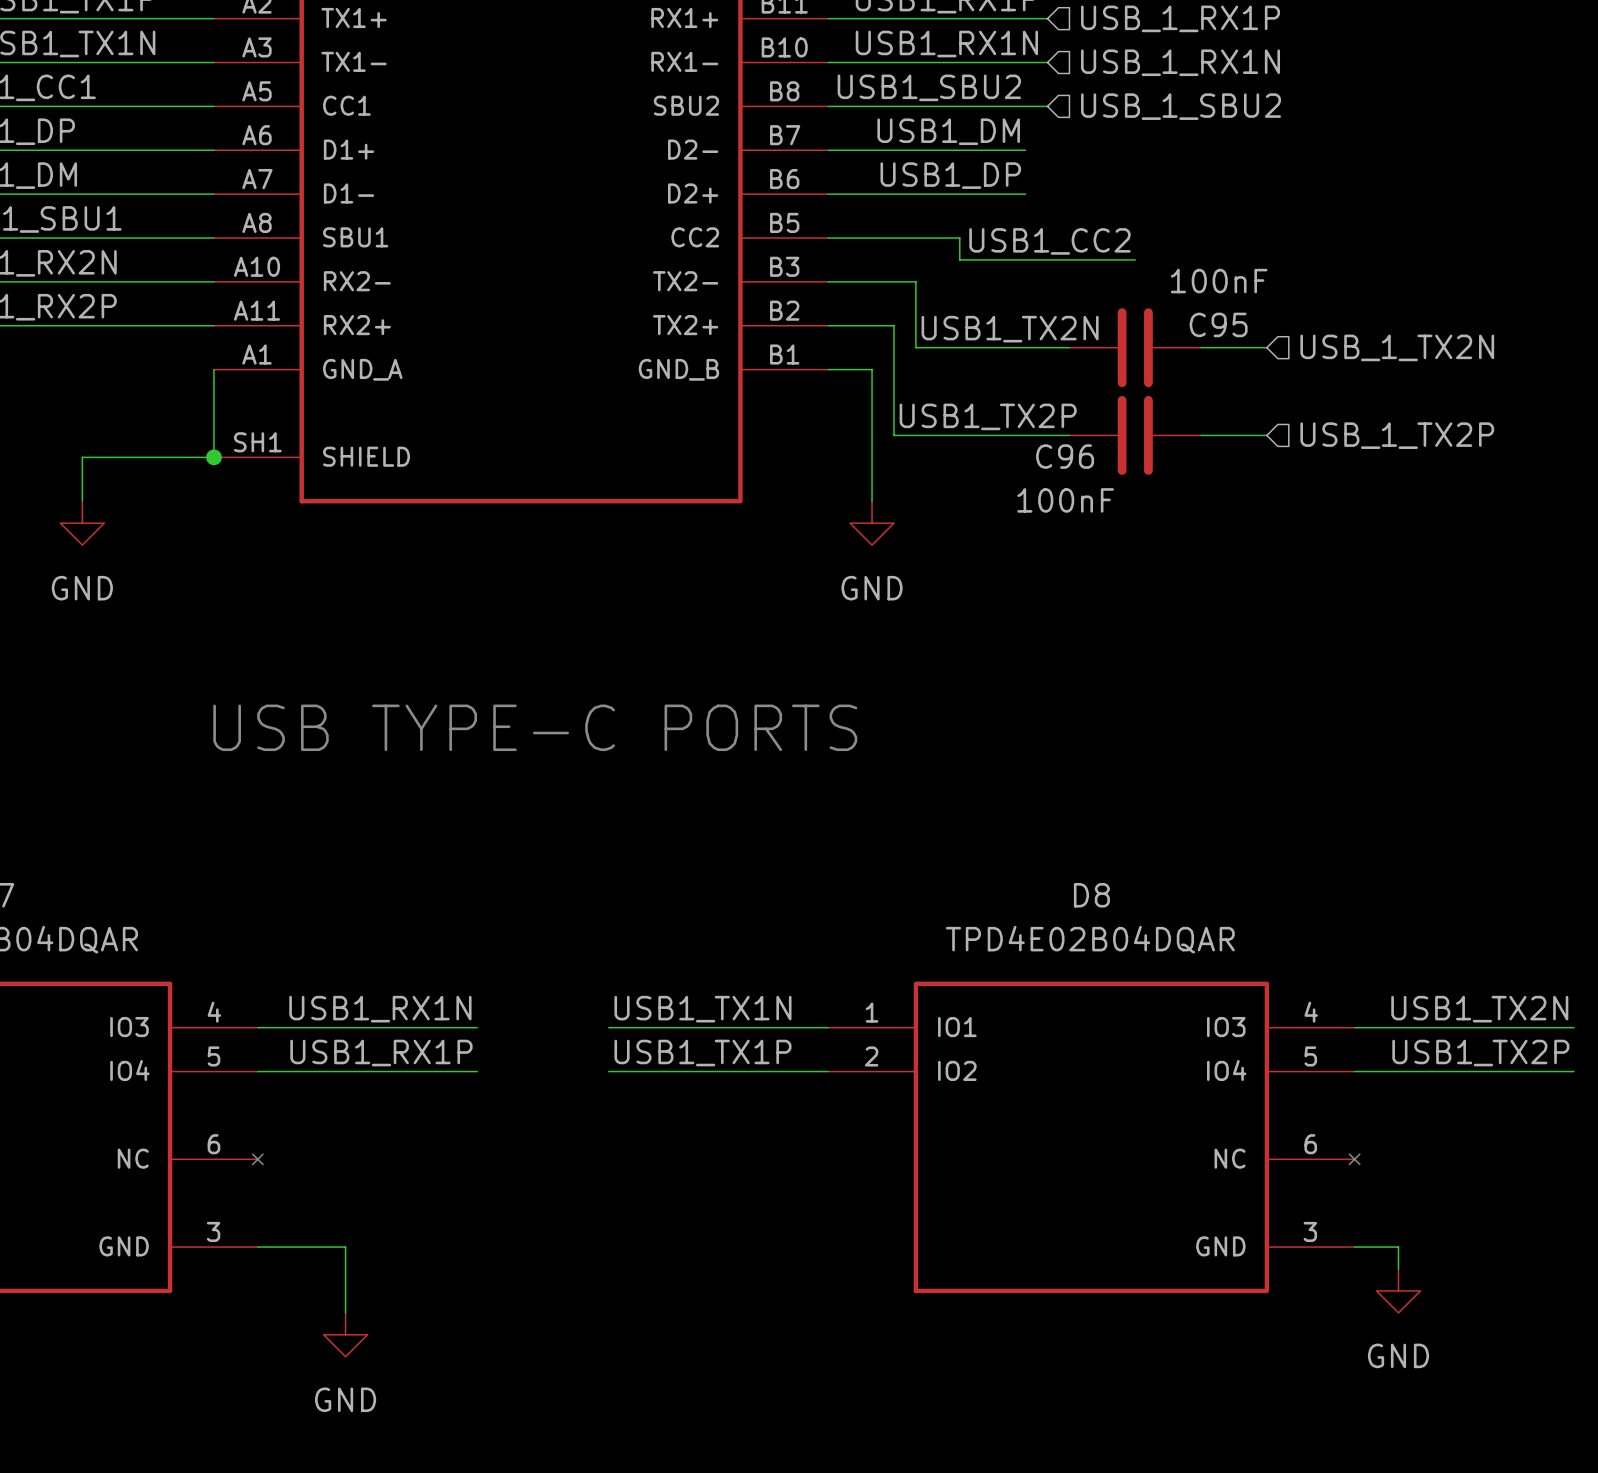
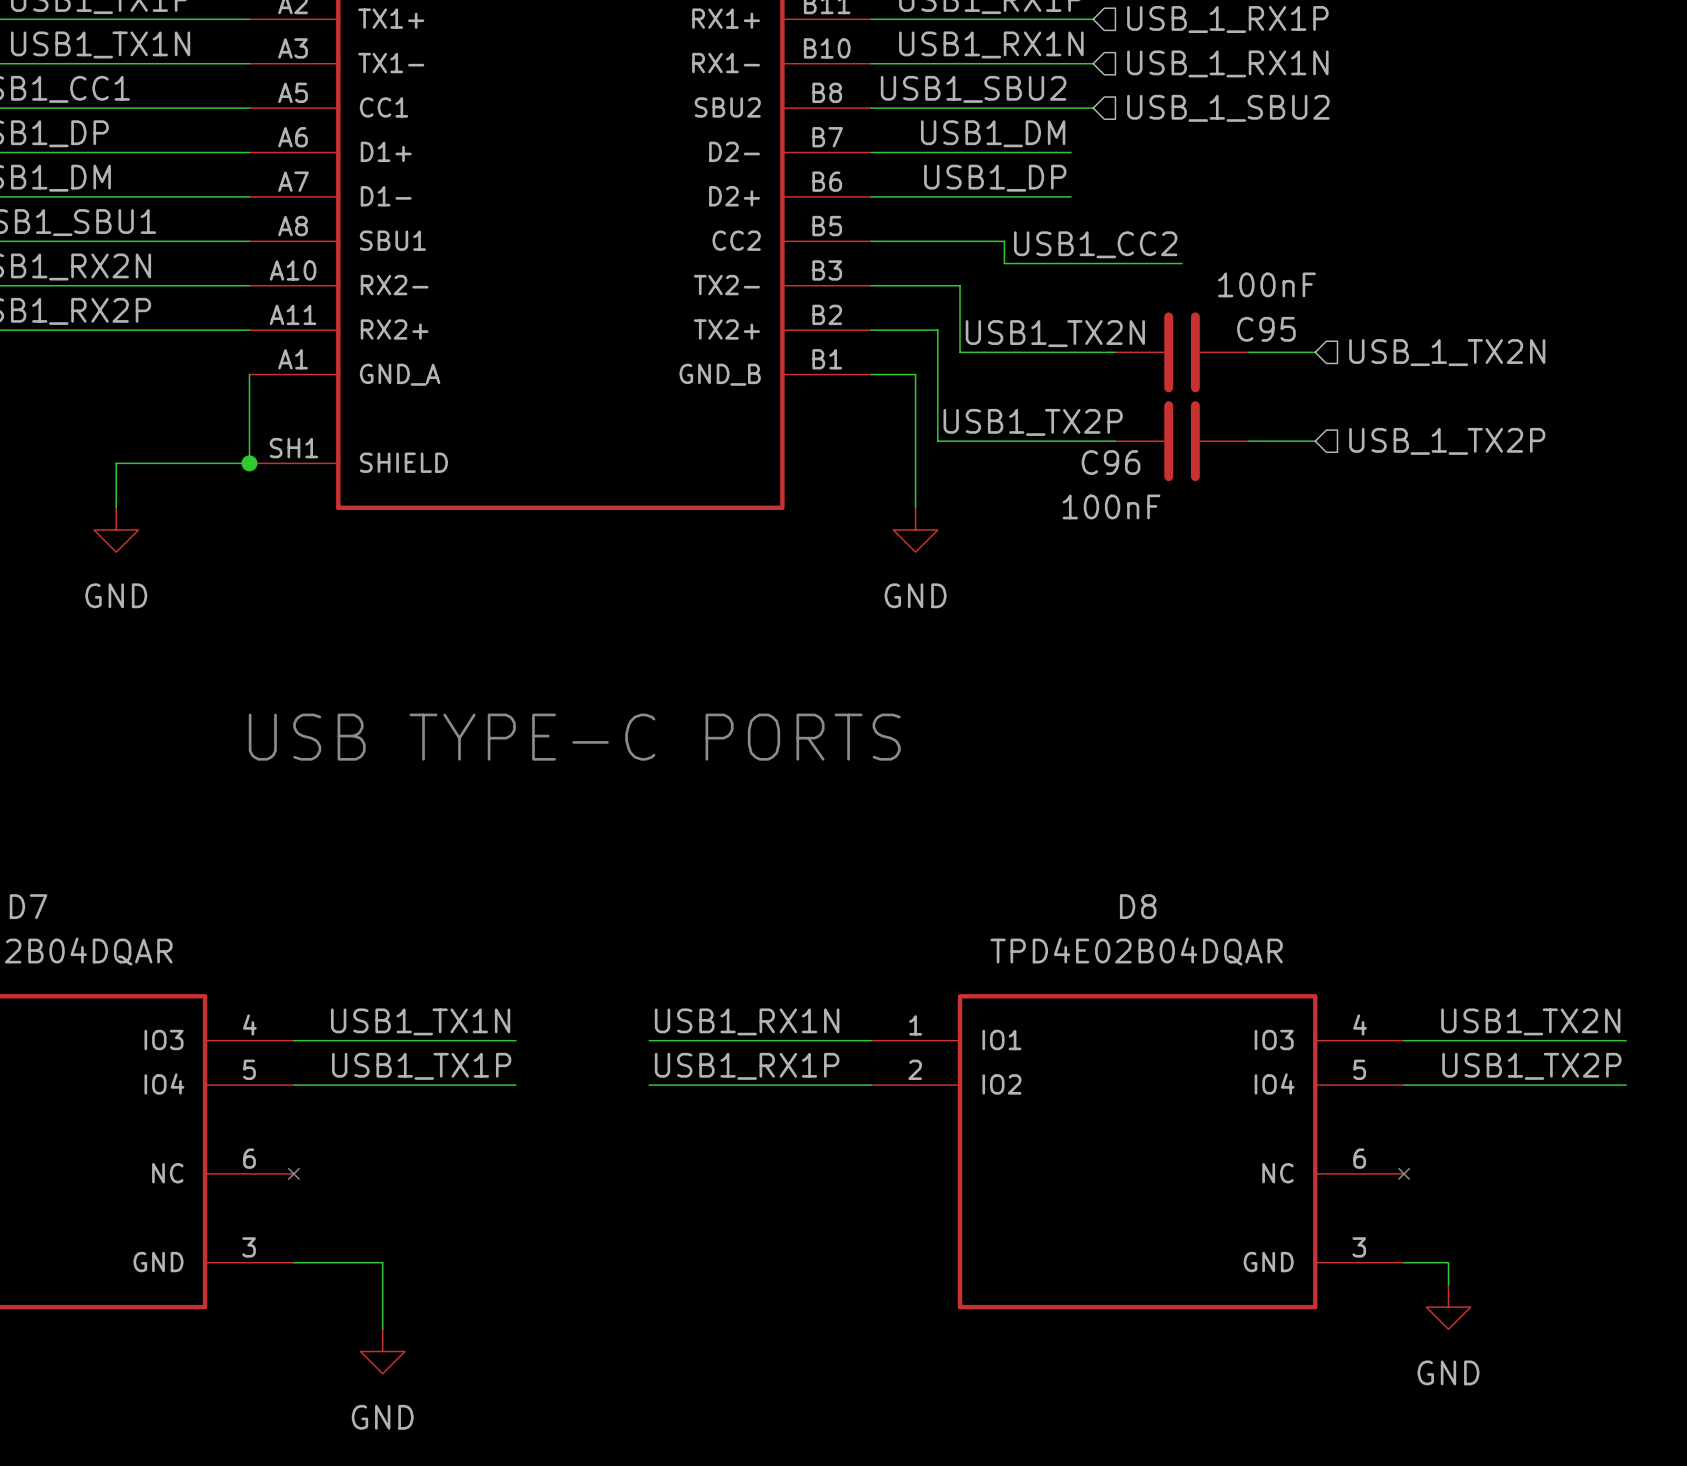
label: USB1_RX1N (380, 1009) -> USB1_TX1N (420, 1021)
label: USB1_TX1N (702, 1009) -> USB1_RX1N (747, 1021)
label: USB1_RX1P (381, 1053) -> USB1_TX1P (421, 1066)
label: USB1_TX1P (702, 1053) -> USB1_RX1P (747, 1066)

